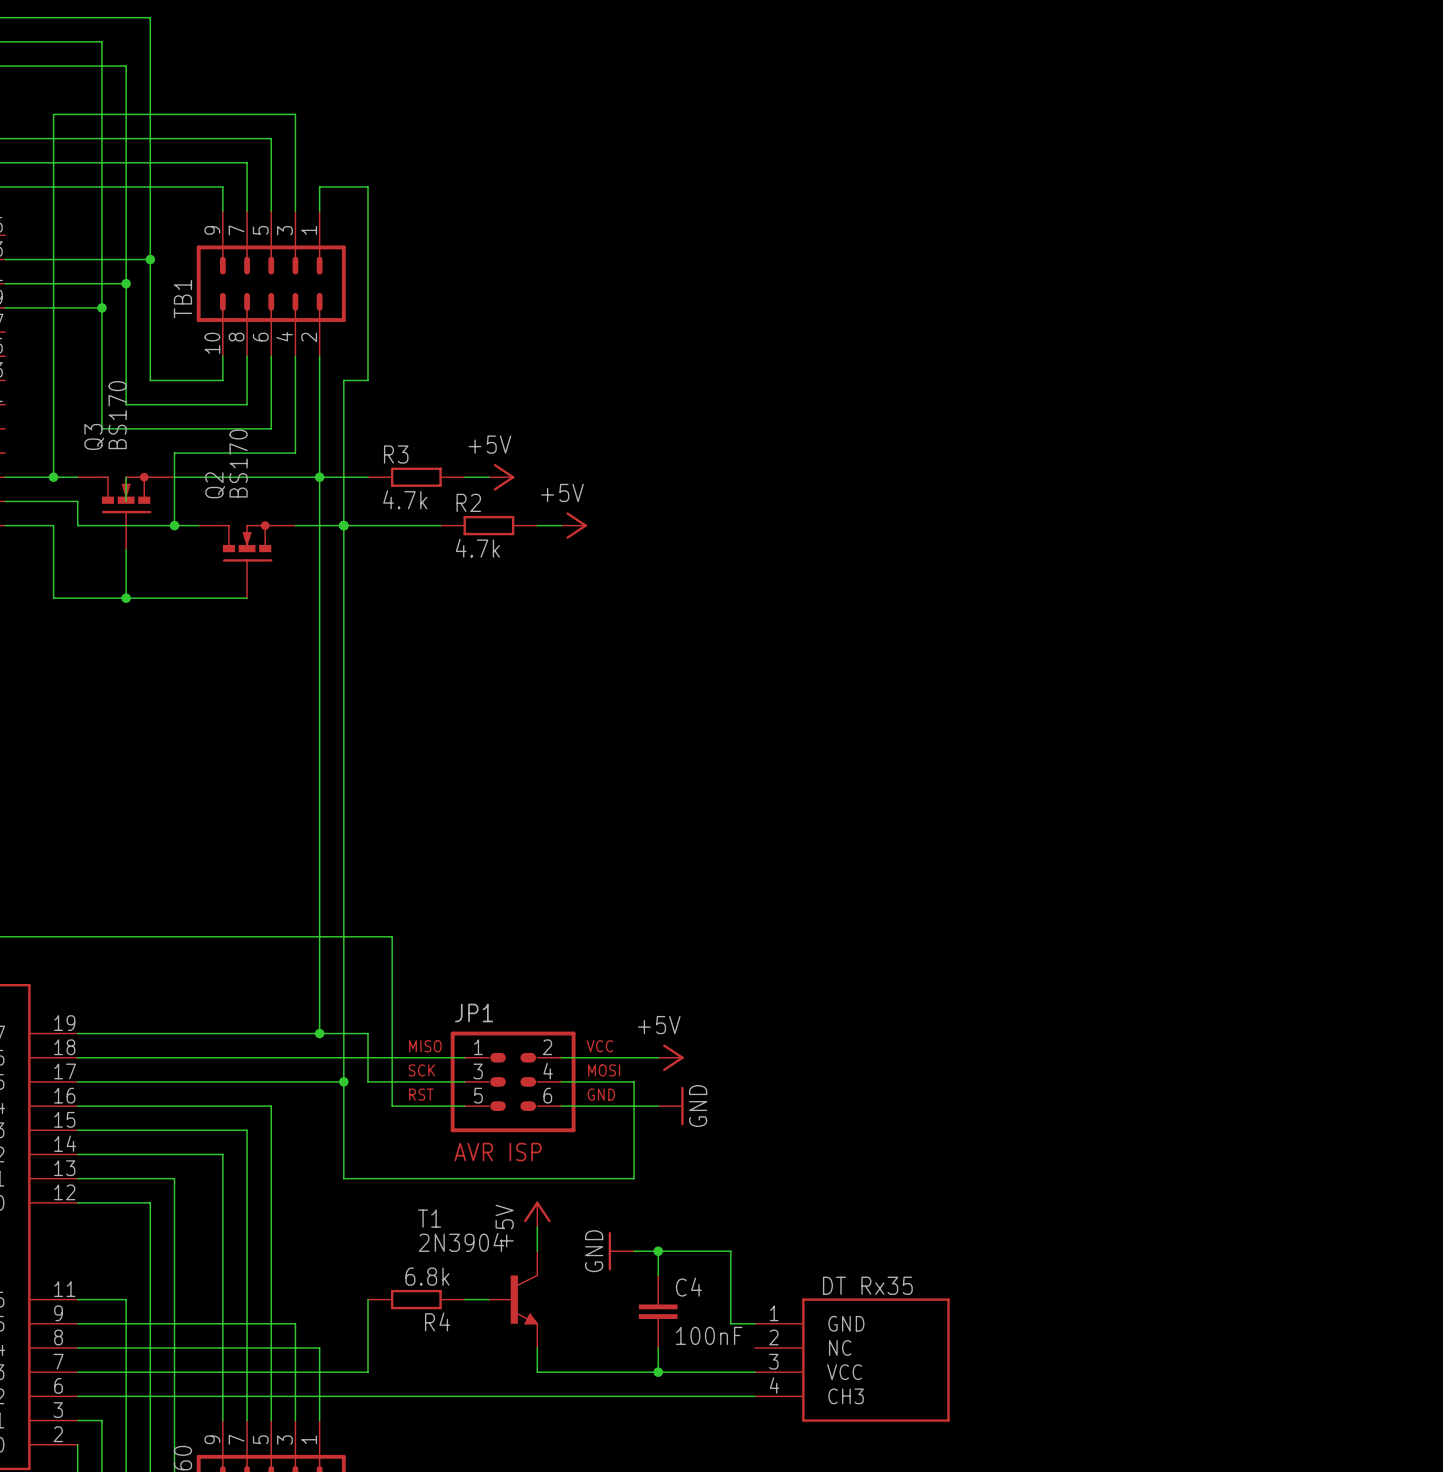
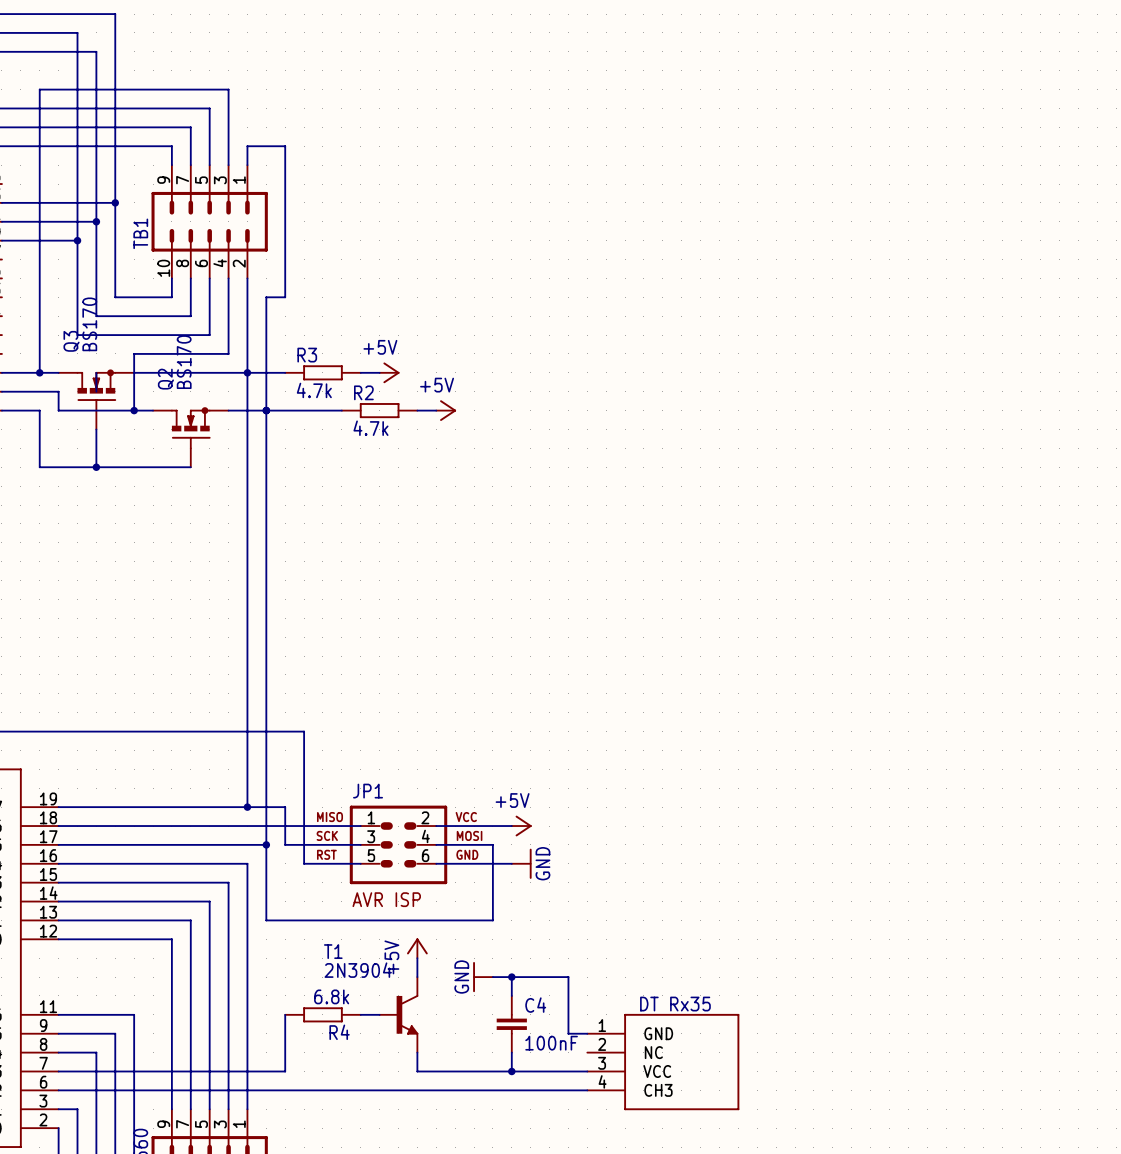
wire: (271, 1106) (271, 1154) -> (171, 901) (209, 901)
wire: (247, 1130) (247, 1178) -> (134, 920) (190, 920)
wire: (222, 1154) (222, 1202) -> (115, 939) (171, 939)
wire: (174, 1178) (174, 1299) -> (96, 1014) (134, 1014)
wire: (150, 1202) (150, 1323) (295, 1323) -> (190, 882) (228, 882) (228, 1033)
wire: (126, 1299) (126, 1347) (319, 1347) -> (209, 863) (247, 863) (247, 1052)

